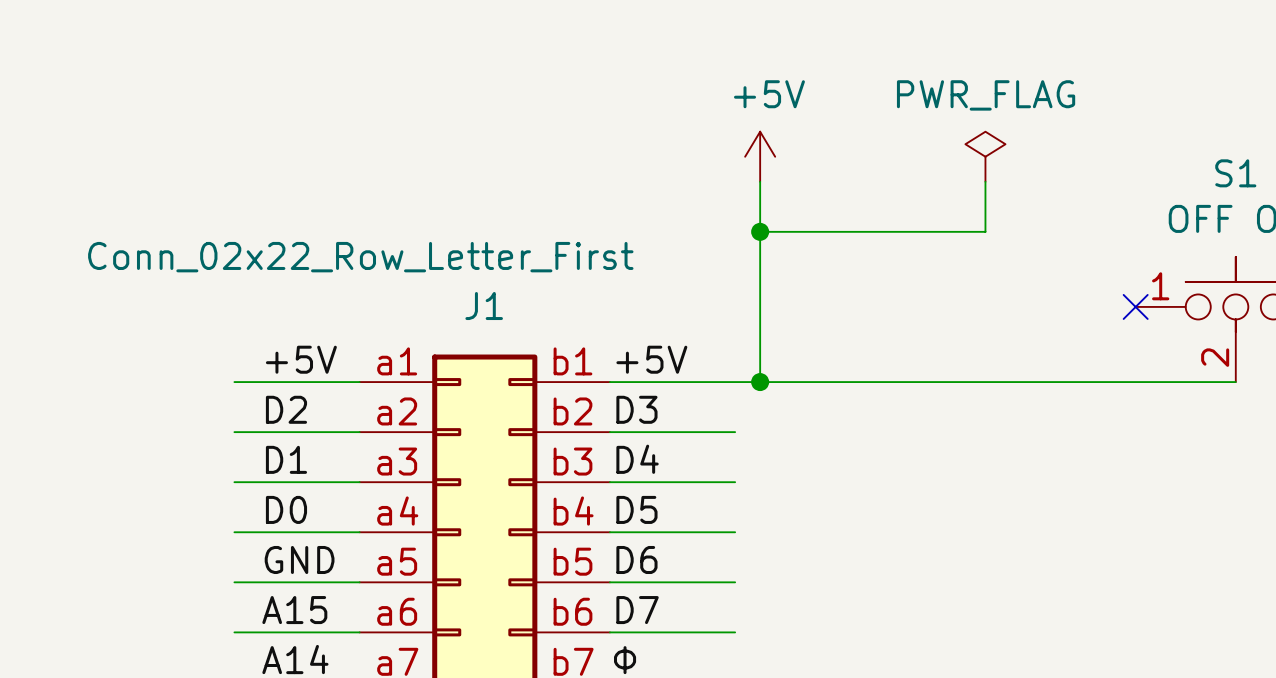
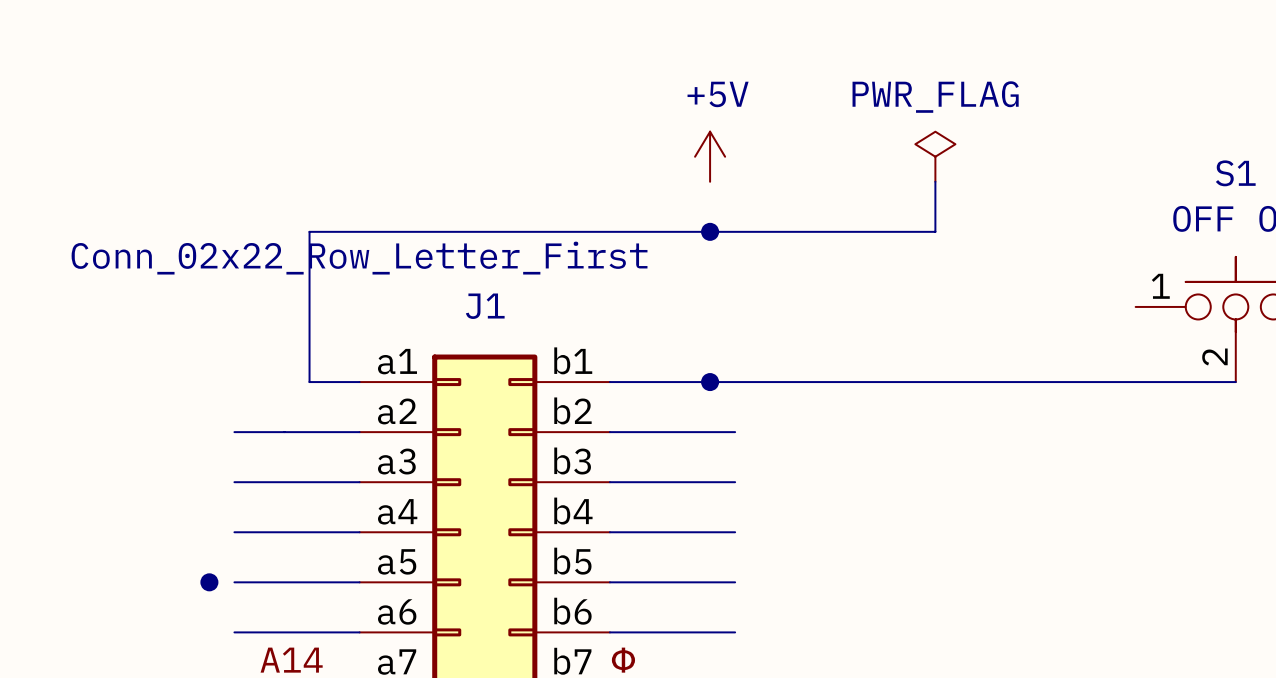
power symbol position: +5V (760, 156) -> +5V (710, 156)
power symbol position: PWR_FLAG (985, 156) -> PWR_FLAG (935, 156)
wire: (760, 181) (760, 382) -> none
wire: (985, 181) (985, 231) (935, 231) -> (935, 181) (935, 231)
junction position: (760, 231) -> (710, 231)
no-connect mark: (1135, 306) -> none
label: +5V (301, 359) -> none
label: +5V (651, 359) -> none
wire: (234, 382) (309, 382) -> (760, 231) (309, 231) (309, 382)
junction position: (760, 382) -> (710, 382)
label: D2 (286, 409) -> none
label: D3 (636, 409) -> none
label: D1 (286, 459) -> none
label: D4 (637, 459) -> none
label: D0 (286, 509) -> none
label: D5 (636, 509) -> none
label: GND (299, 559) -> none
label: D6 (636, 559) -> none
junction: none -> (209, 582)
label: A15 (294, 610) -> none
label: D7 (637, 610) -> none

